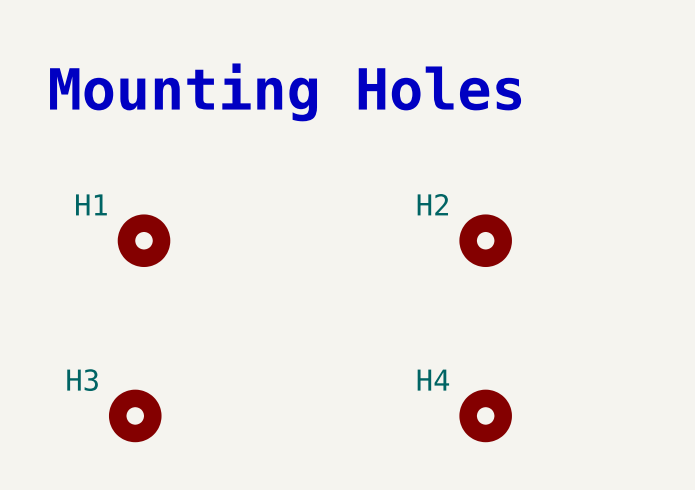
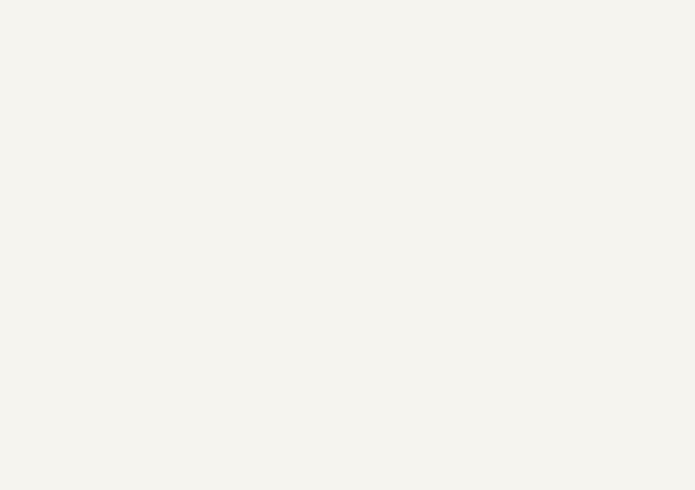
text: Mounting Holes (285, 92) -> none
H1: (144, 240) -> none
H2: (485, 240) -> none
H3: (135, 415) -> none
H4: (485, 415) -> none

